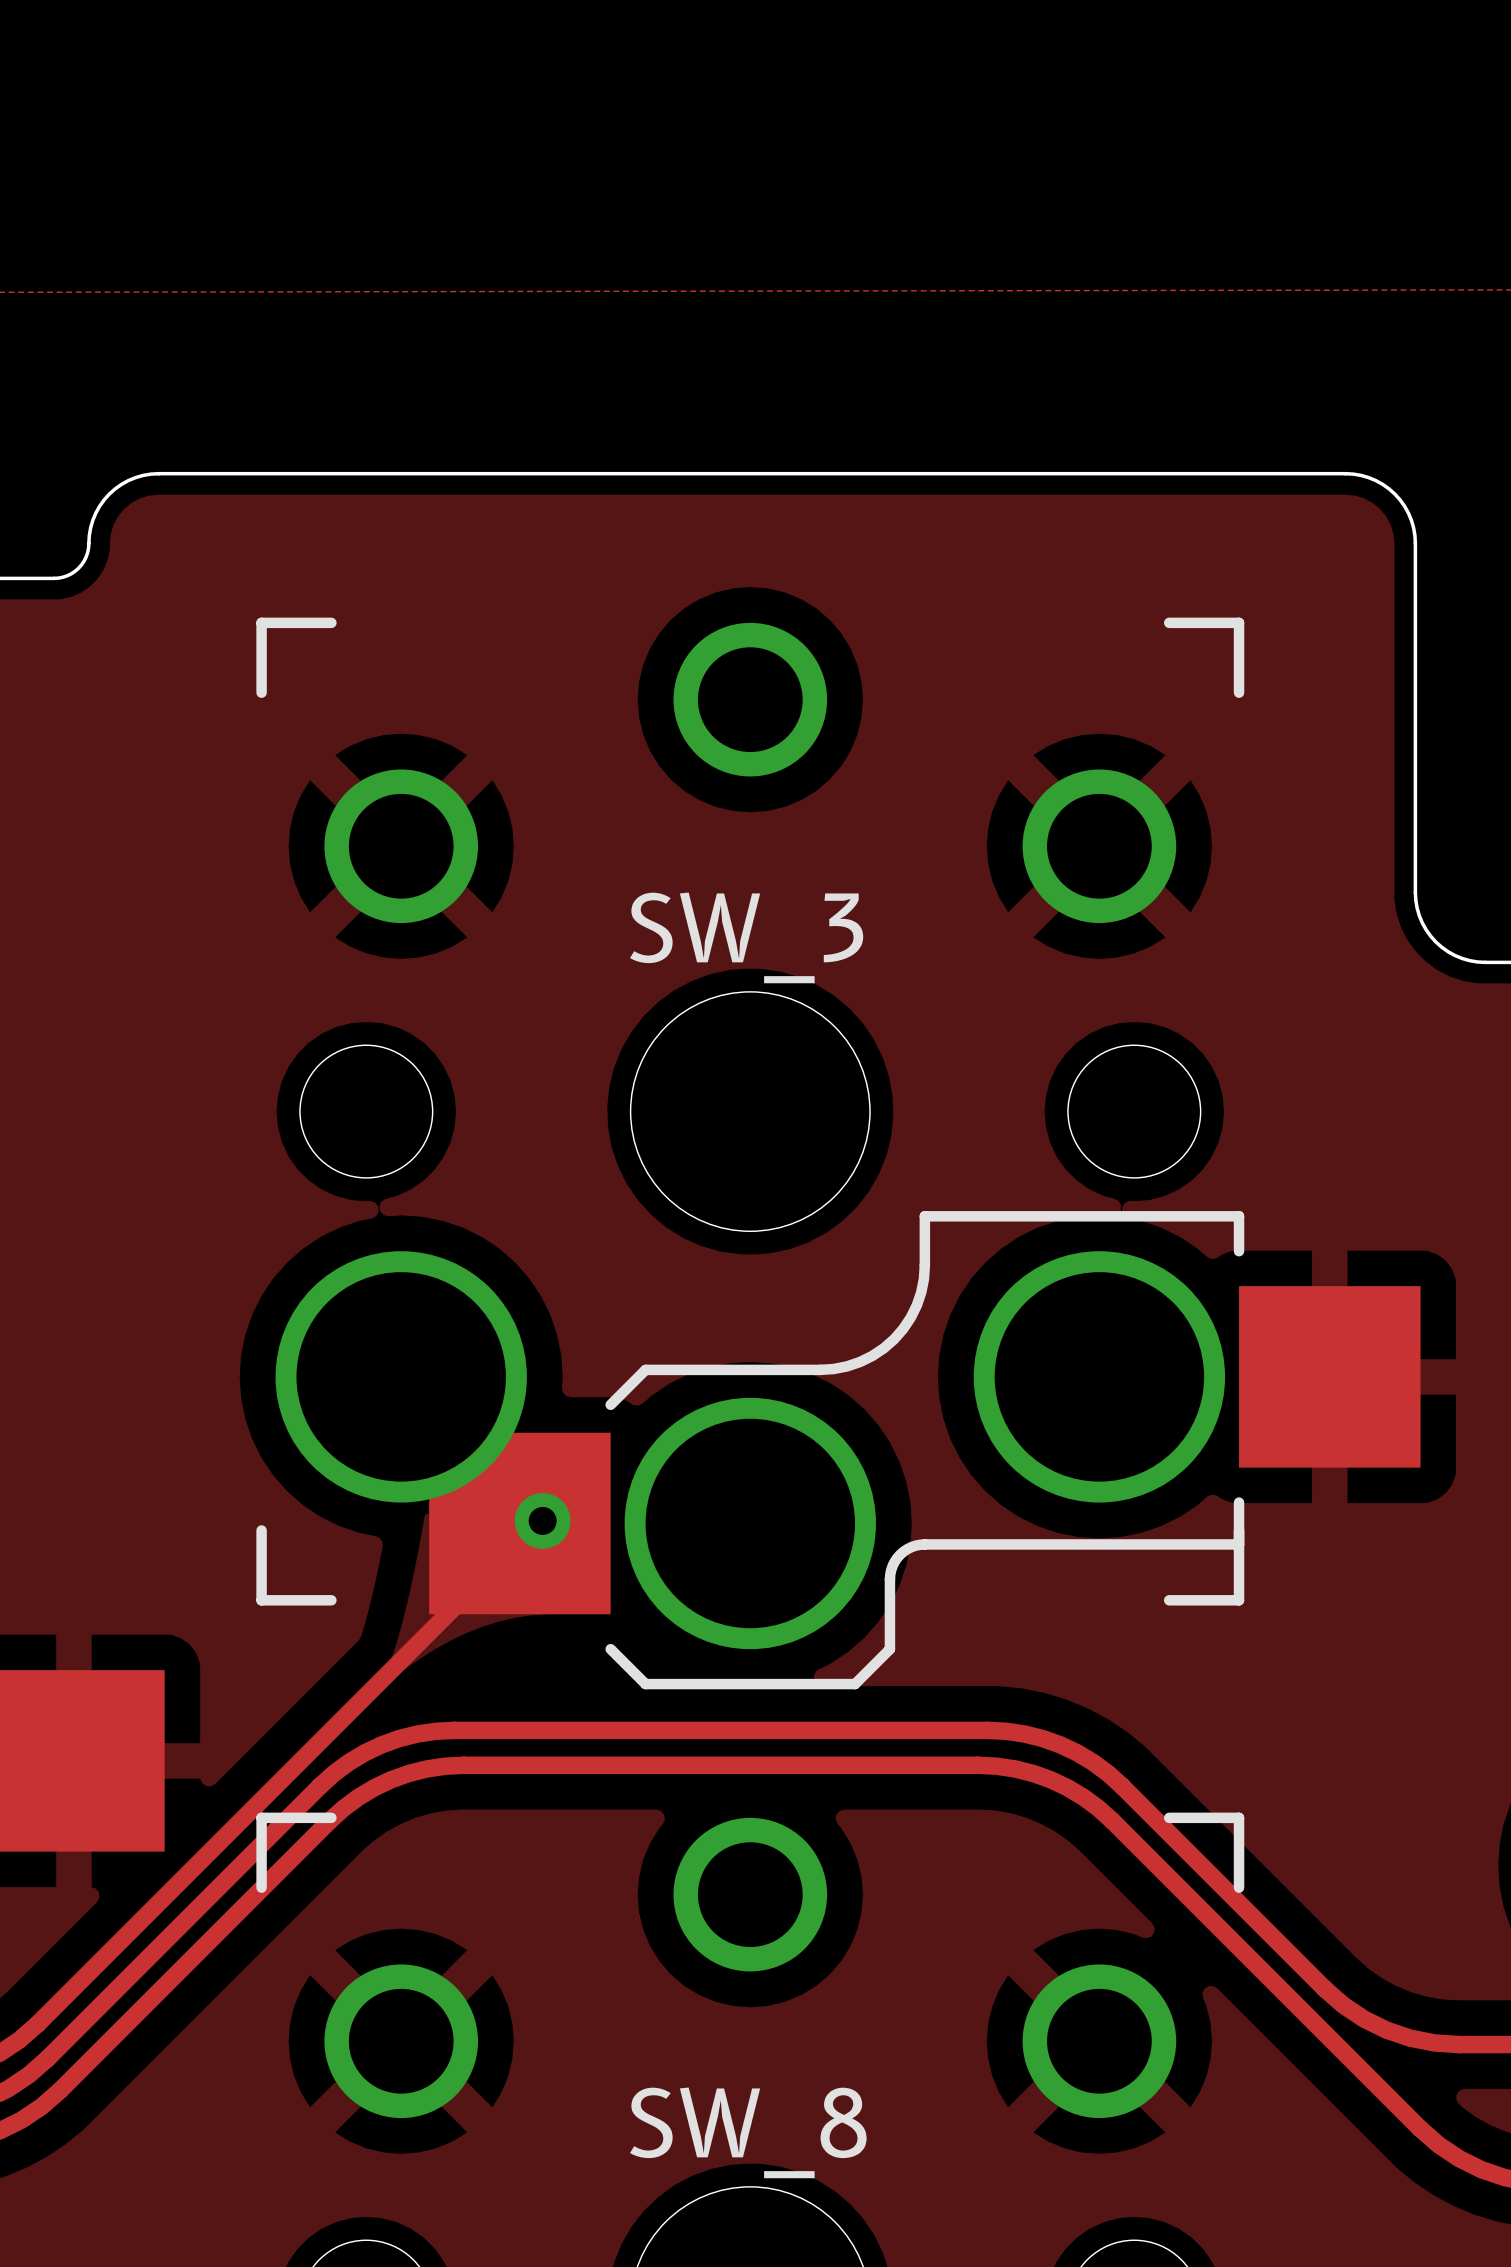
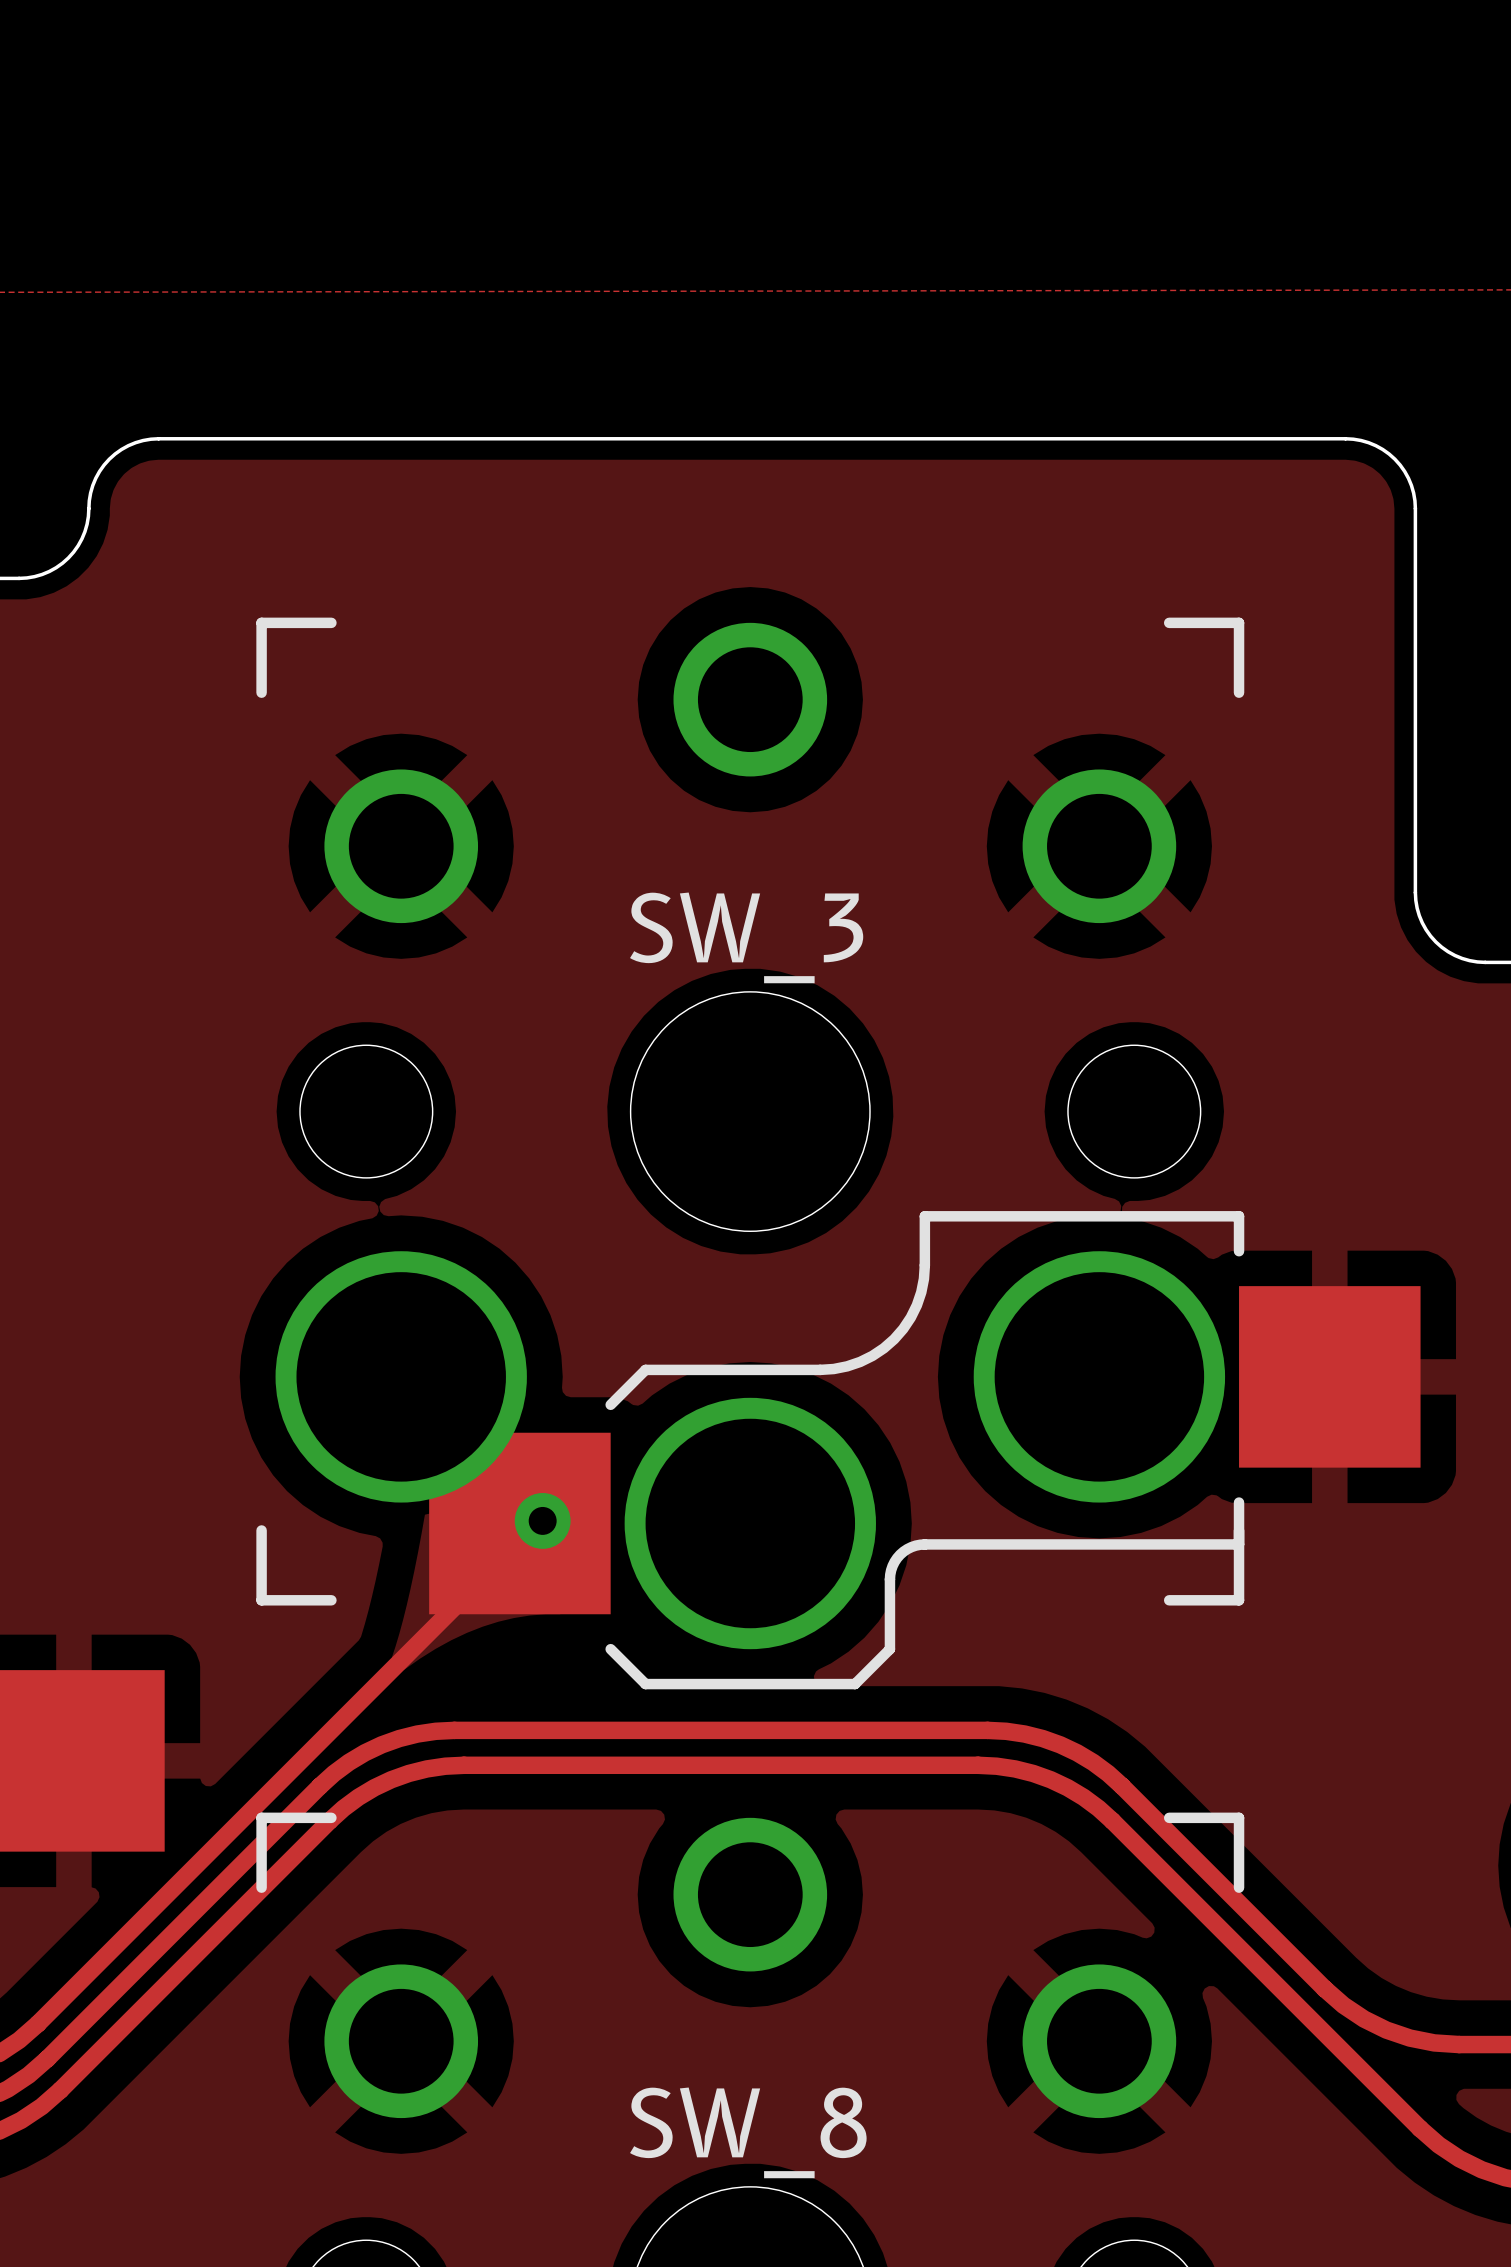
board edge: (1415, 543) (1413, 527) (1408, 513) (1394, 494) (1382, 484) (1368, 477) (1345, 473) (158, 473) (143, 475) (128, 480) (115, 488) (104, 499) (92, 520) (86, 556) (75, 571) (58, 578) (19, 578) -> (1415, 543) (1414, 500) (1411, 485) (1404, 471) (1394, 459) (1382, 449) (1368, 442) (1353, 439) (158, 438) (135, 442) (121, 449) (109, 459) (99, 471) (92, 485) (87, 524) (81, 538) (73, 552) (62, 563) (49, 571) (34, 576) (19, 578)

